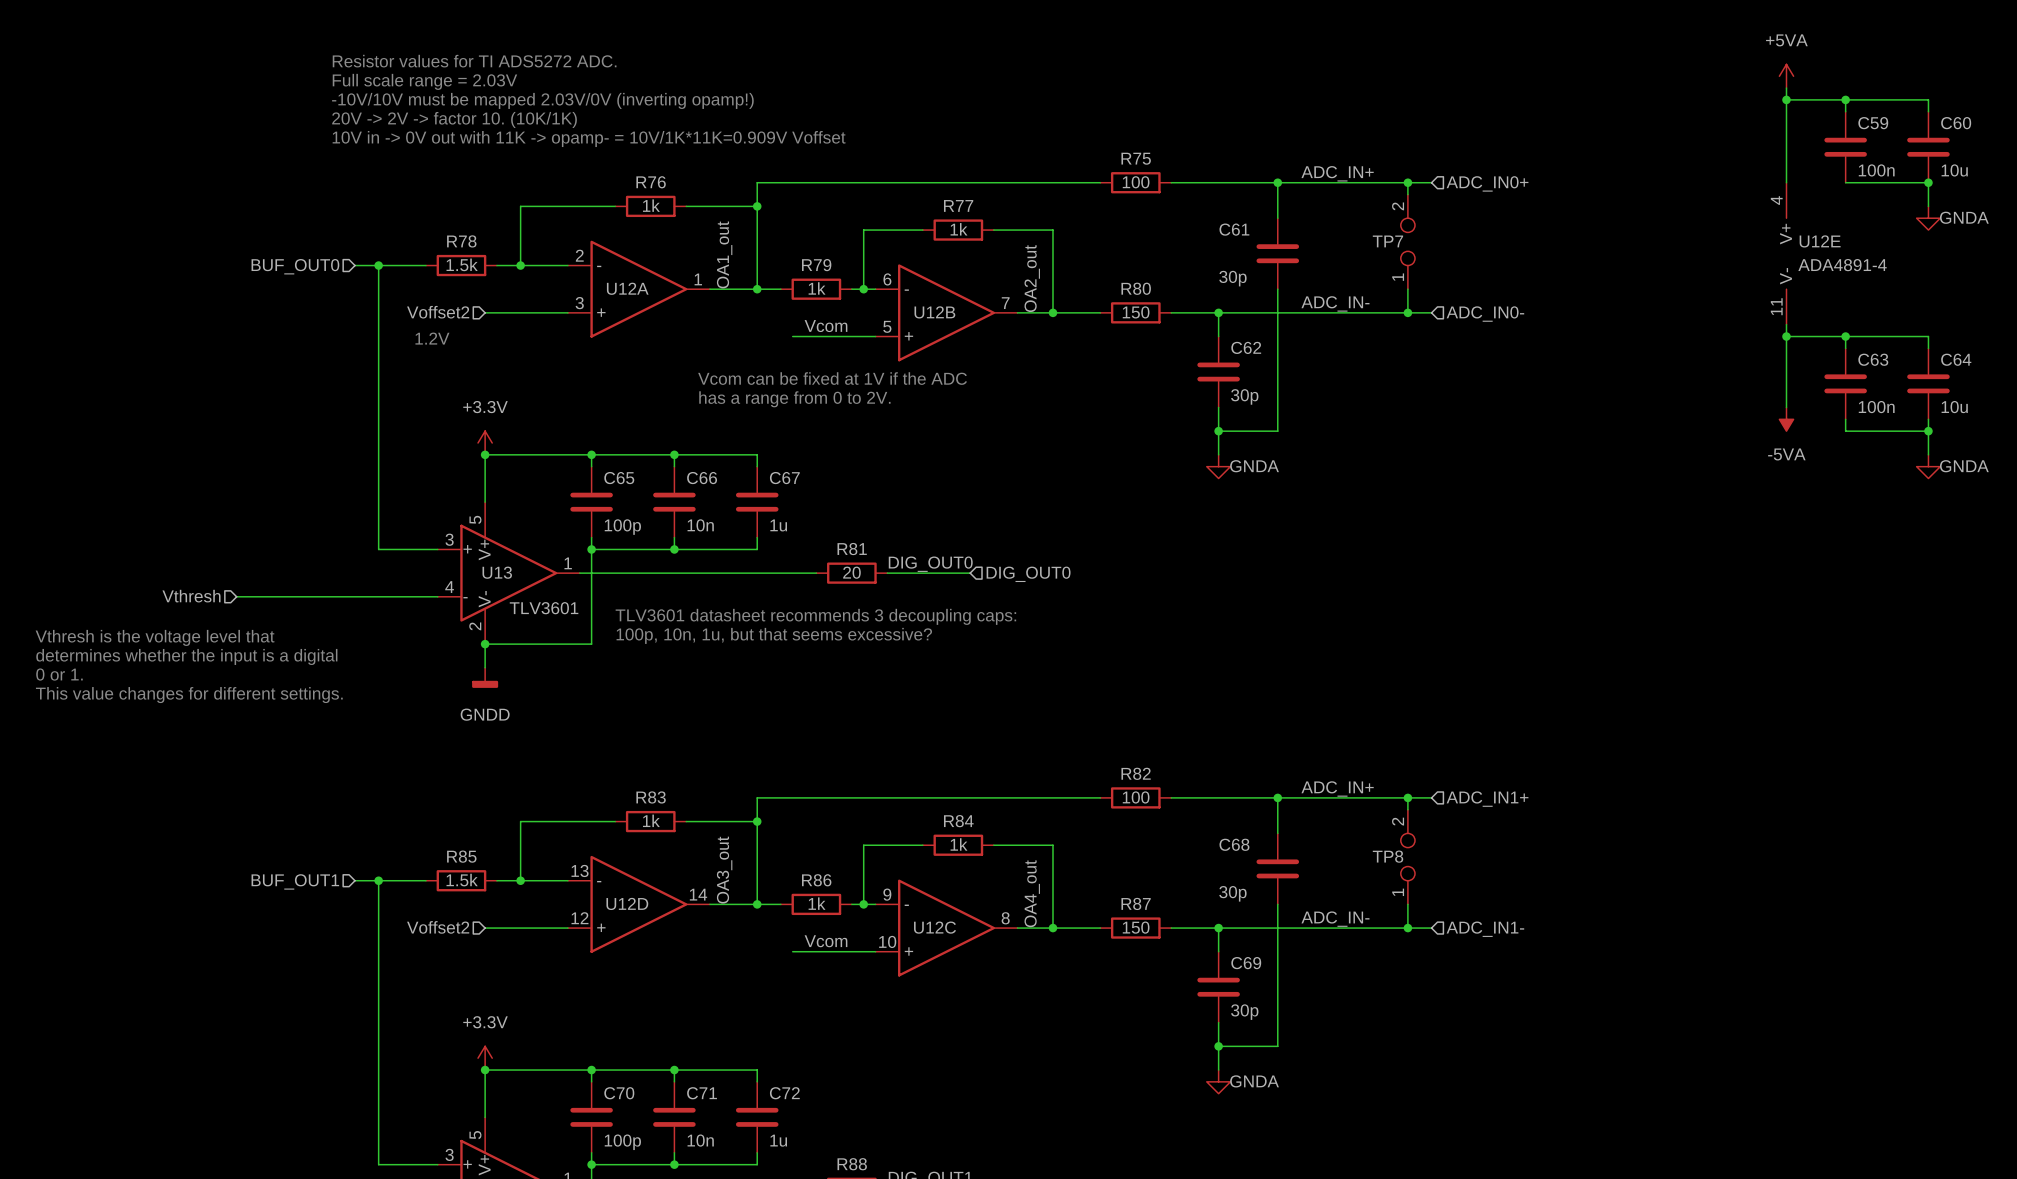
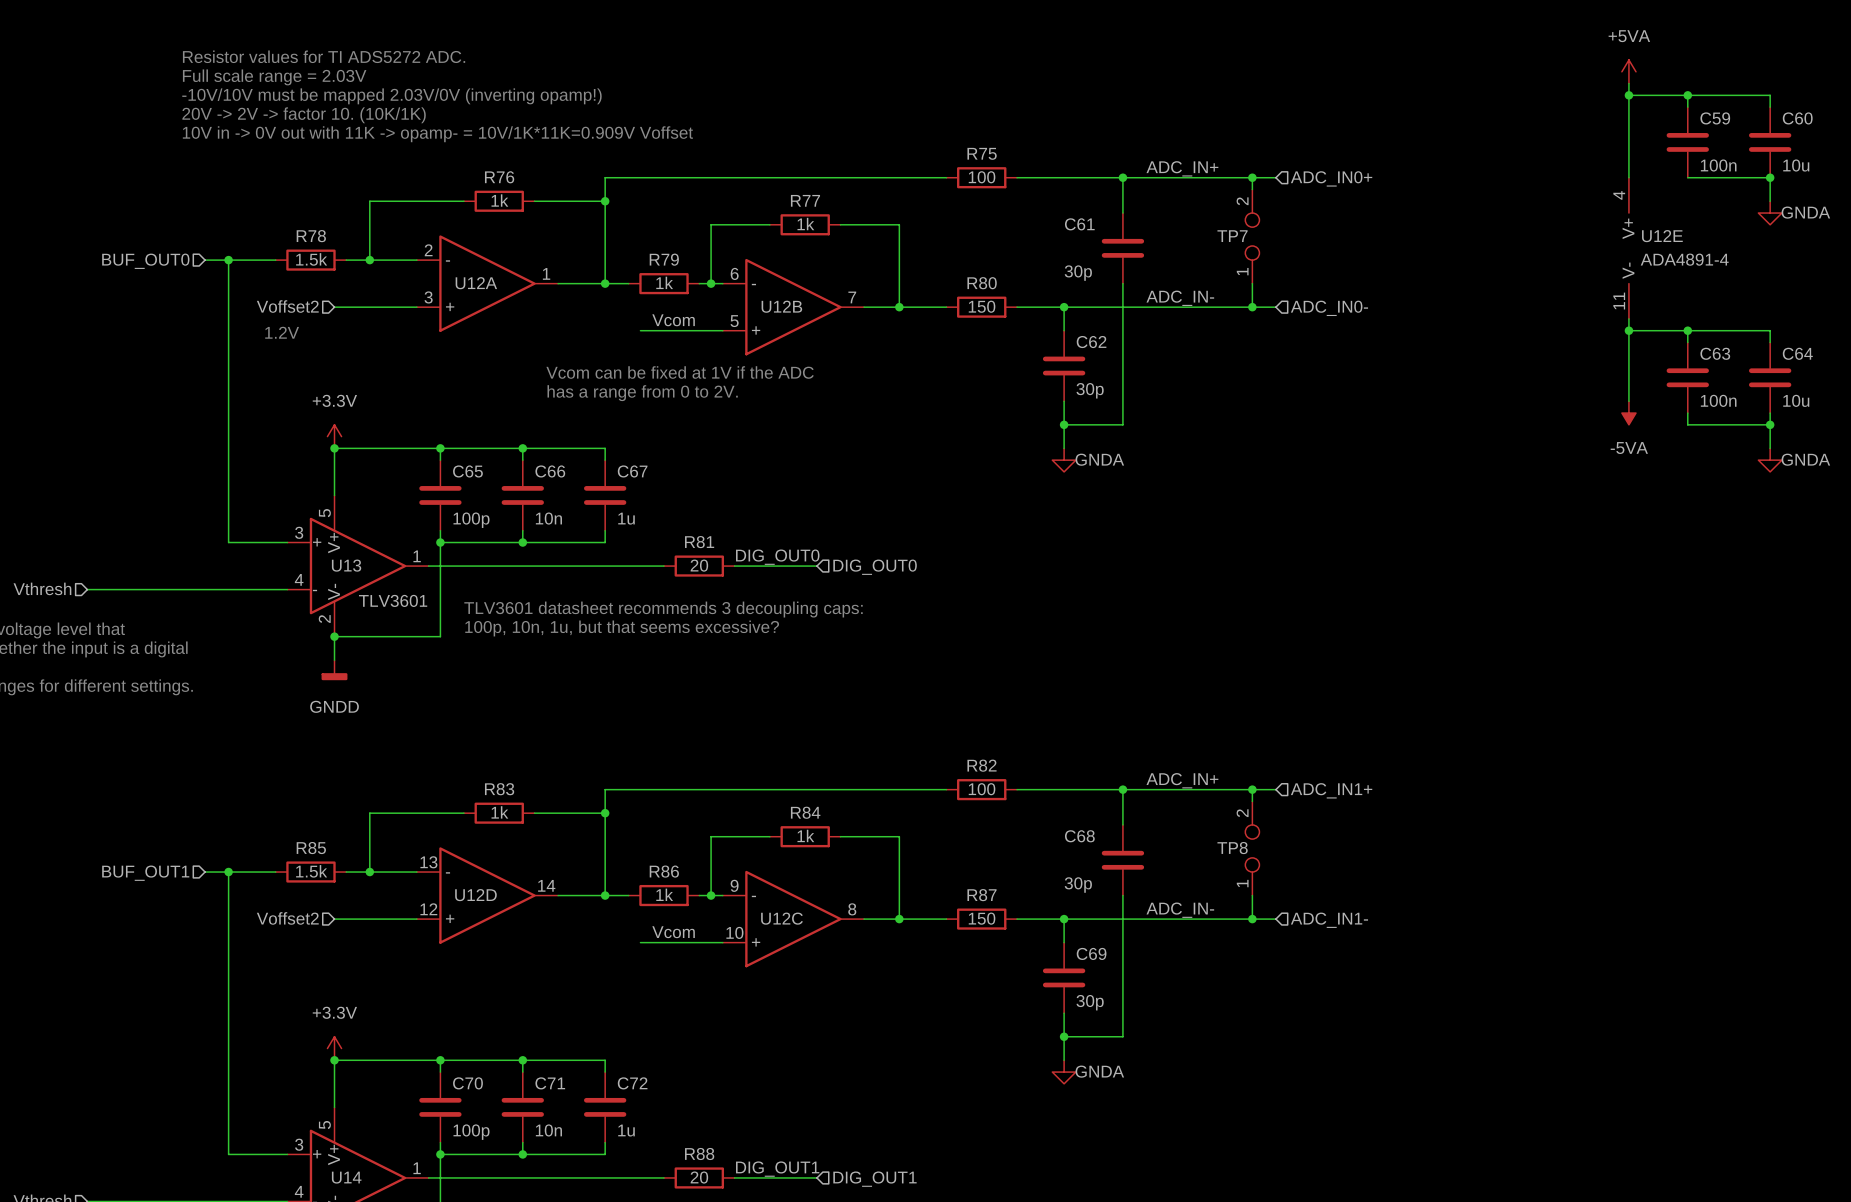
label: OA1_out (724, 254) -> none
label: OA2_out (1032, 278) -> none
label: OA3_out (724, 870) -> none
label: OA4_out (1032, 893) -> none

